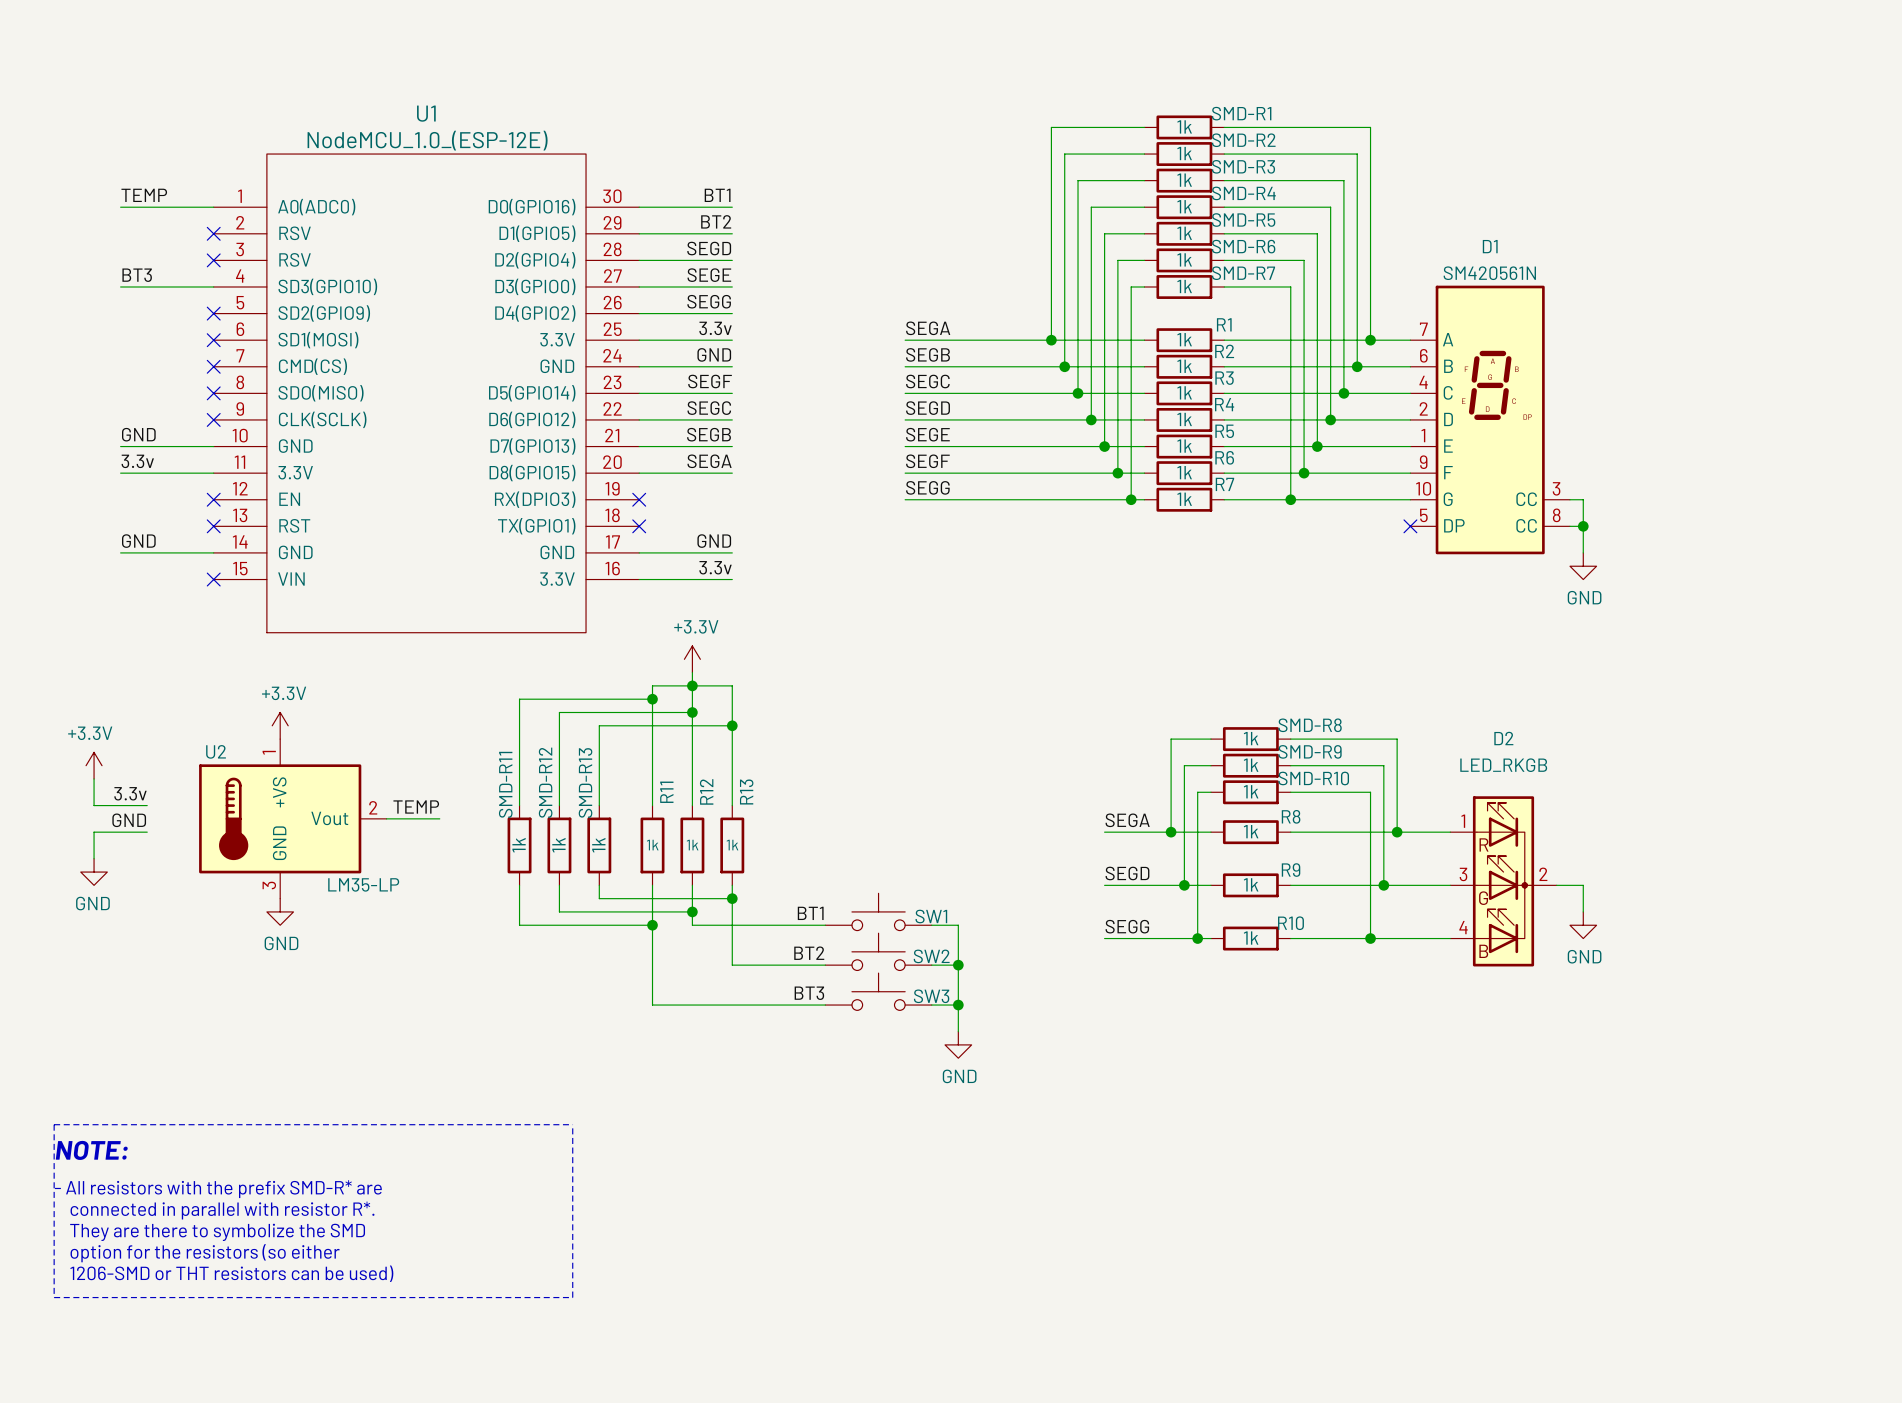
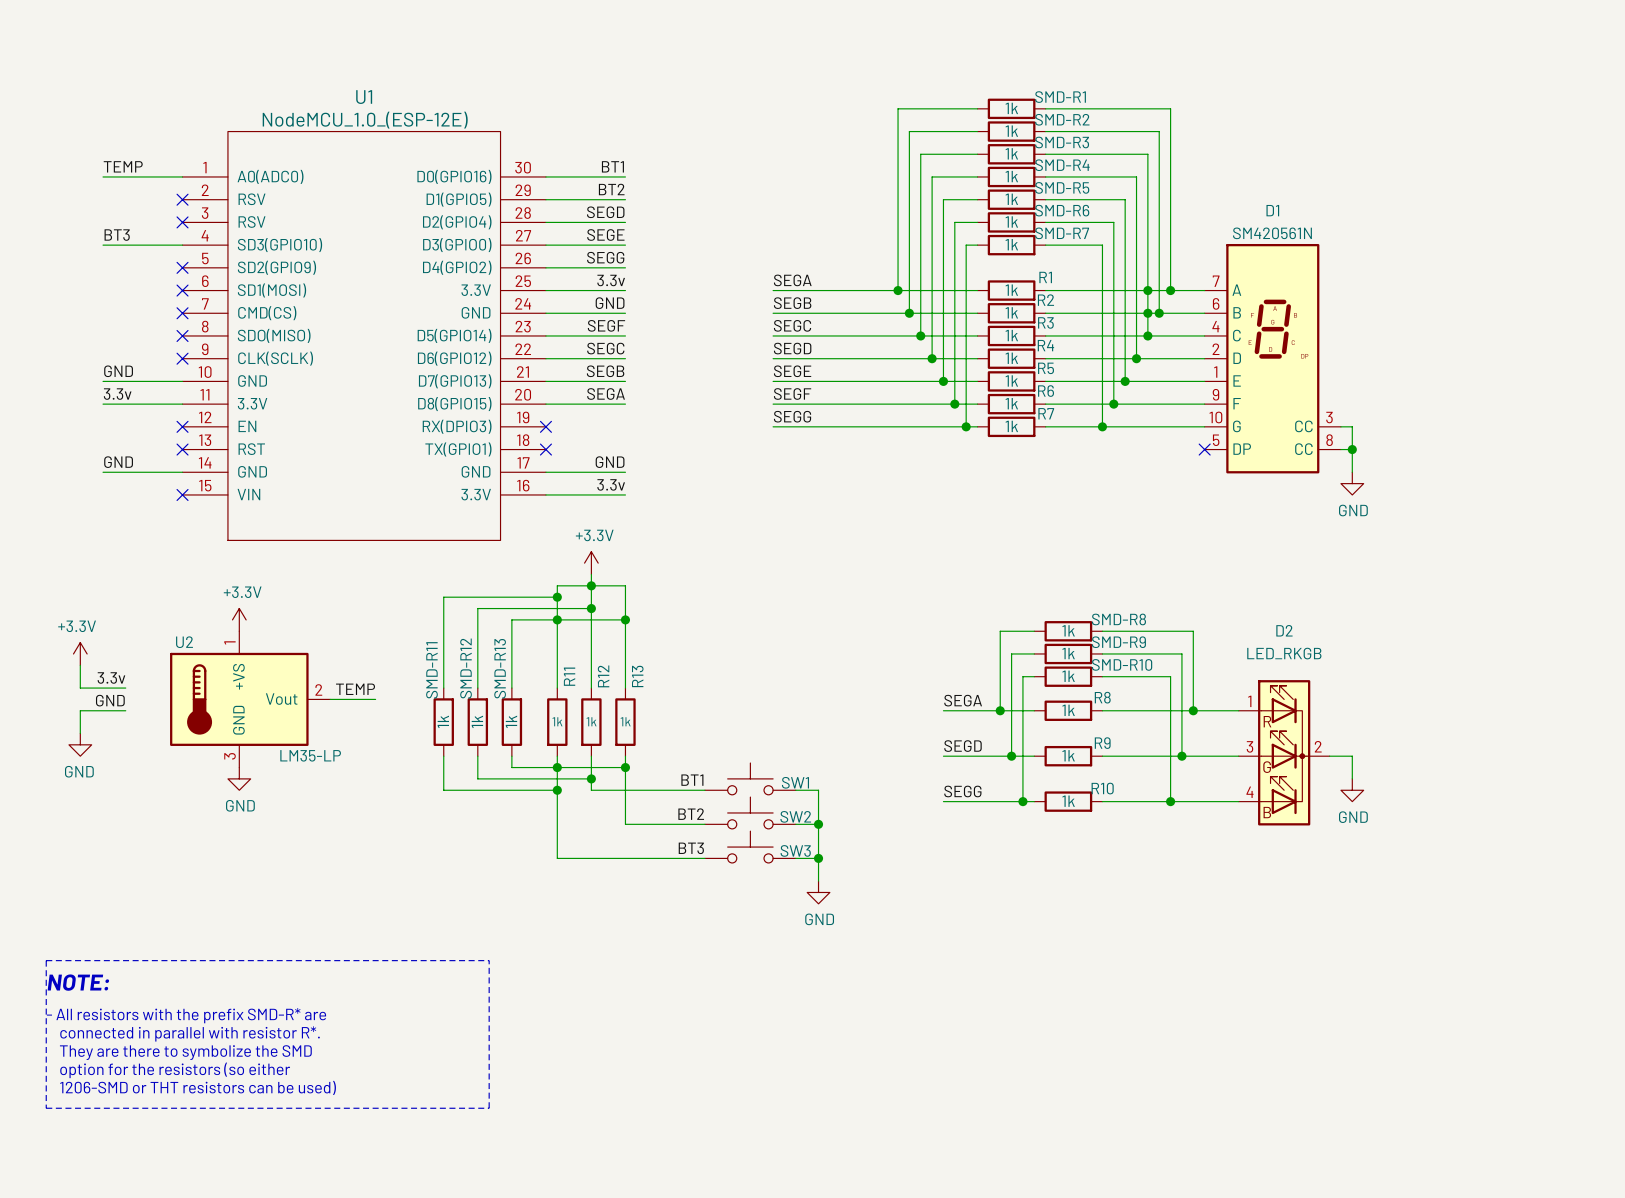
junction: none -> (1147, 290)
junction: none -> (1147, 313)
junction: none -> (557, 619)
junction: none -> (557, 767)

